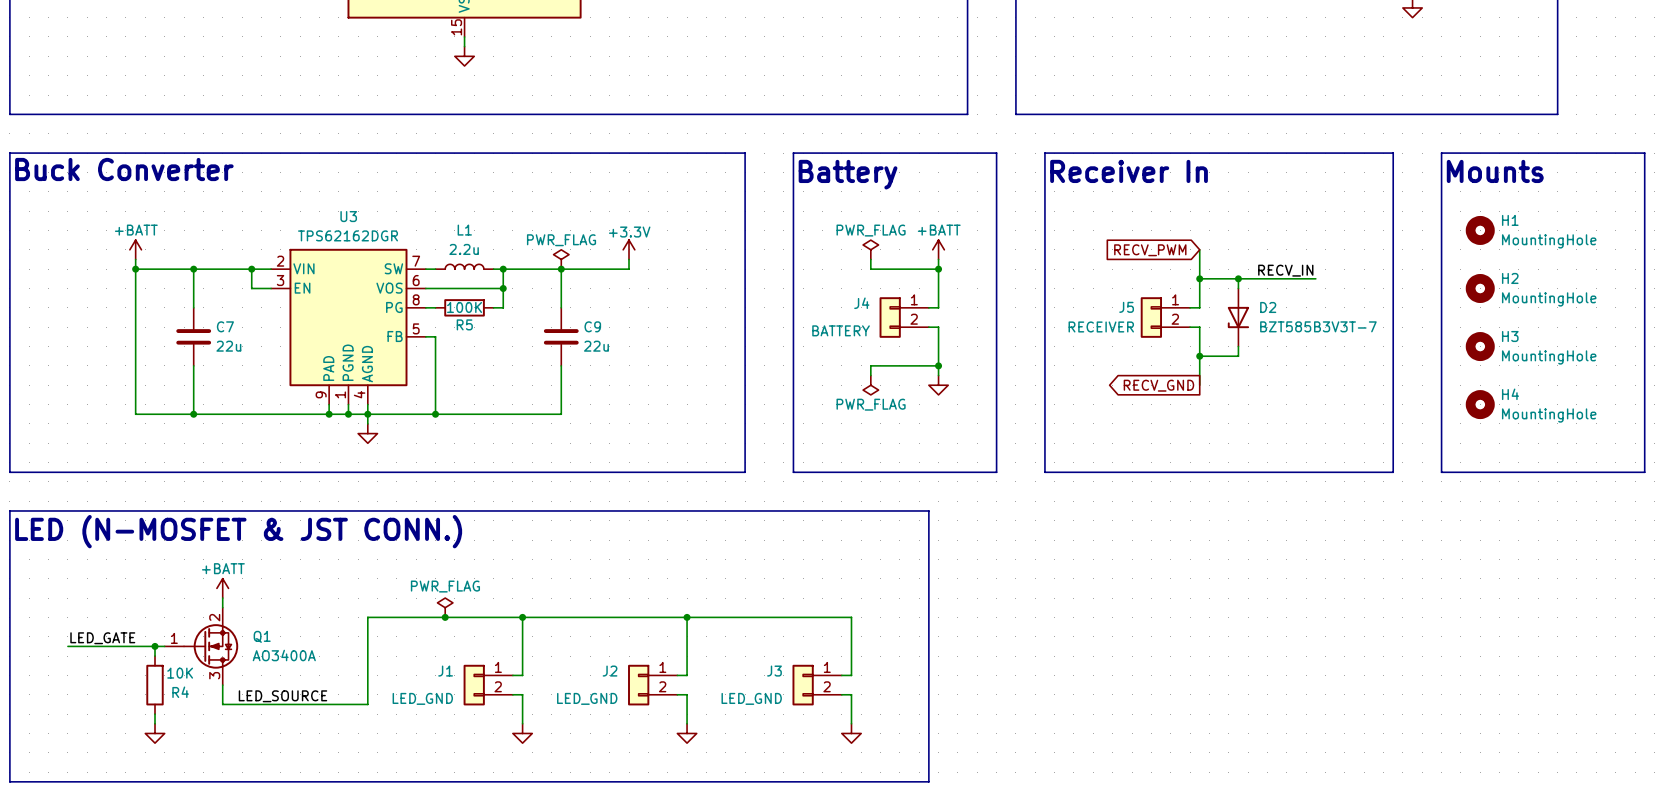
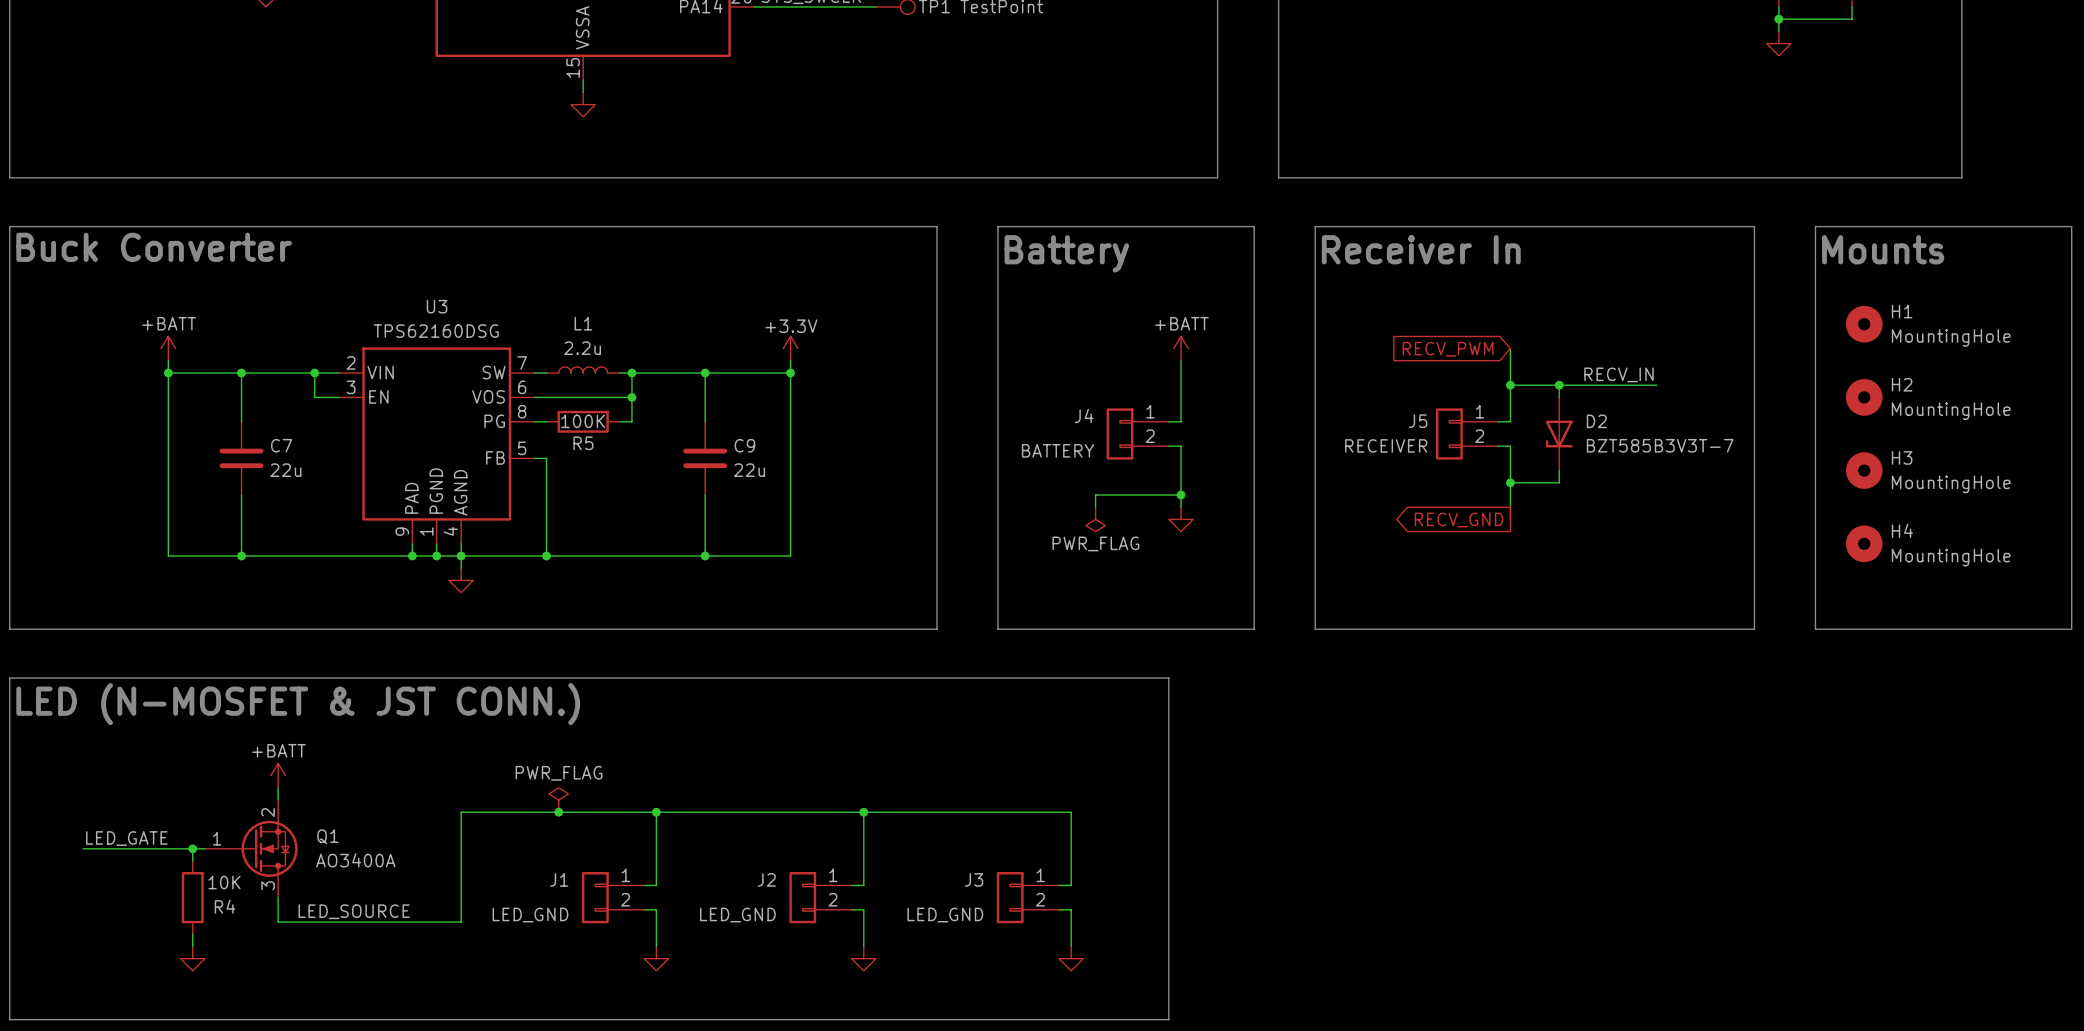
U3 value: TPS62162DGR (348, 235) -> TPS62160DSG (436, 331)
power symbol: PWR_FLAG (870, 249) -> none
power symbol: PWR_FLAG (561, 259) -> none
wire: (870, 259) (870, 269) (938, 269) -> none
wire: none -> (790, 373) (790, 556) (705, 556)
junction: none -> (790, 373)
junction: (938, 269) -> none
junction: none -> (705, 556)

